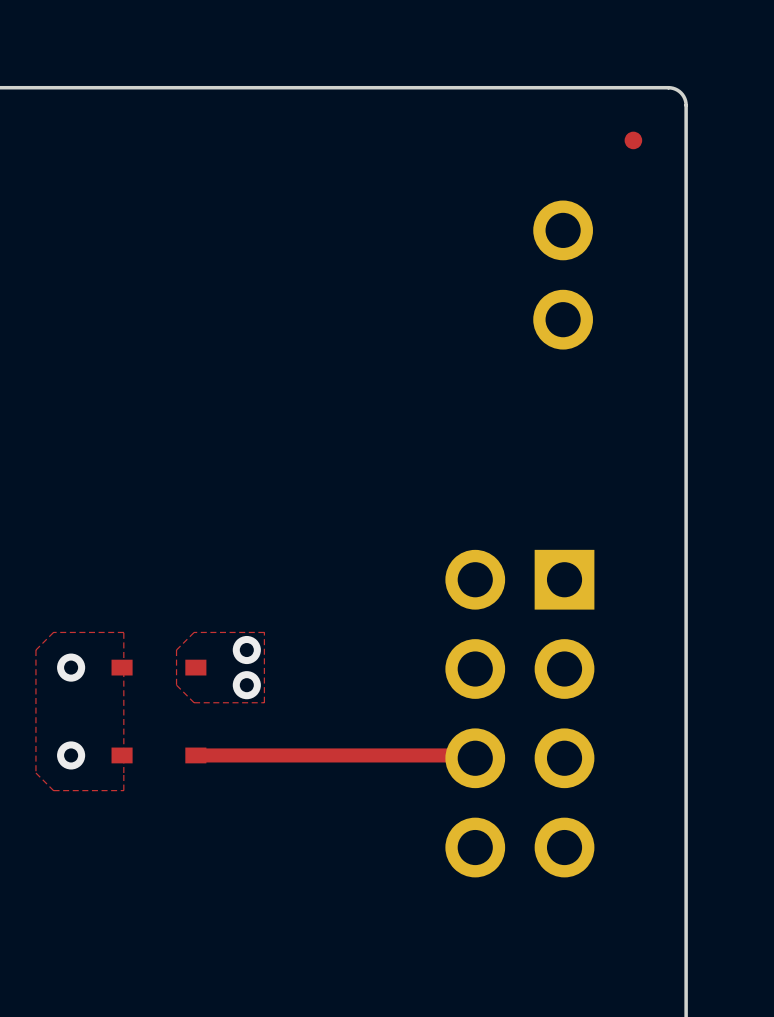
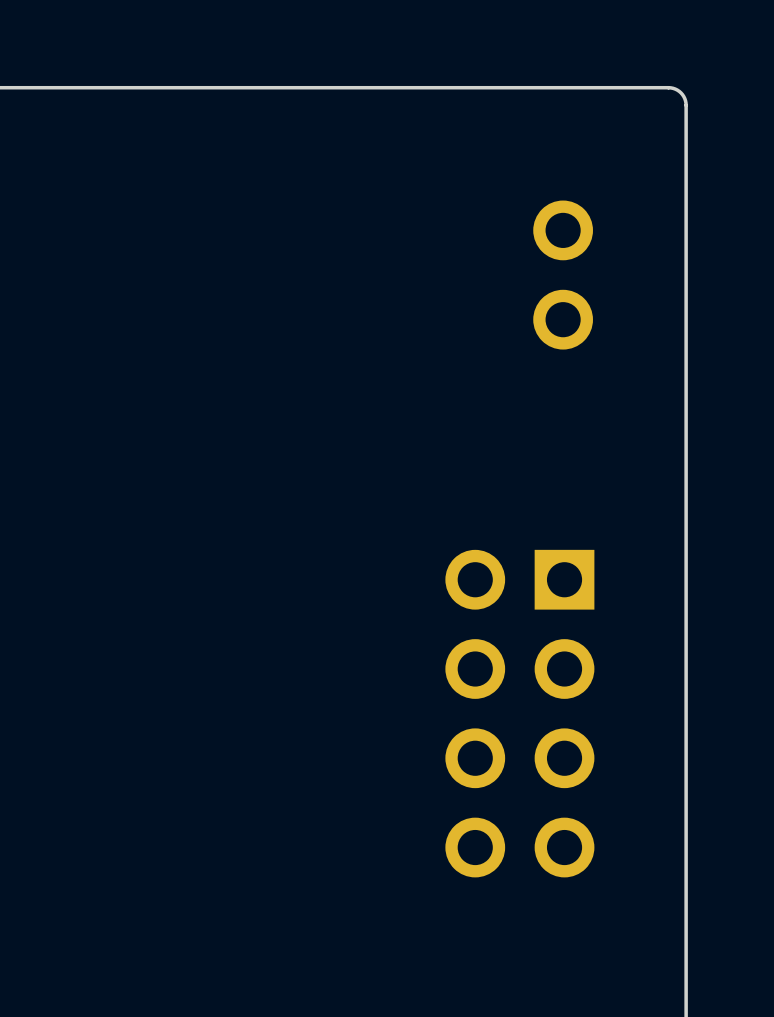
part: (633, 140) -> none
top zone outline: (123, 632) (123, 790) (53, 790) (35, 773) (35, 650) (53, 632) (123, 632) -> none
top zone outline: (264, 632) (194, 632) (176, 650) (176, 685) (194, 702) (264, 702) (264, 632) -> none
via: (246, 650) -> none
via: (71, 667) -> none
part: (158, 667) -> none
via: (246, 685) -> none
via: (71, 755) -> none
part: (158, 755) -> none
top track: (195, 755) (472, 755) (475, 758) -> none

